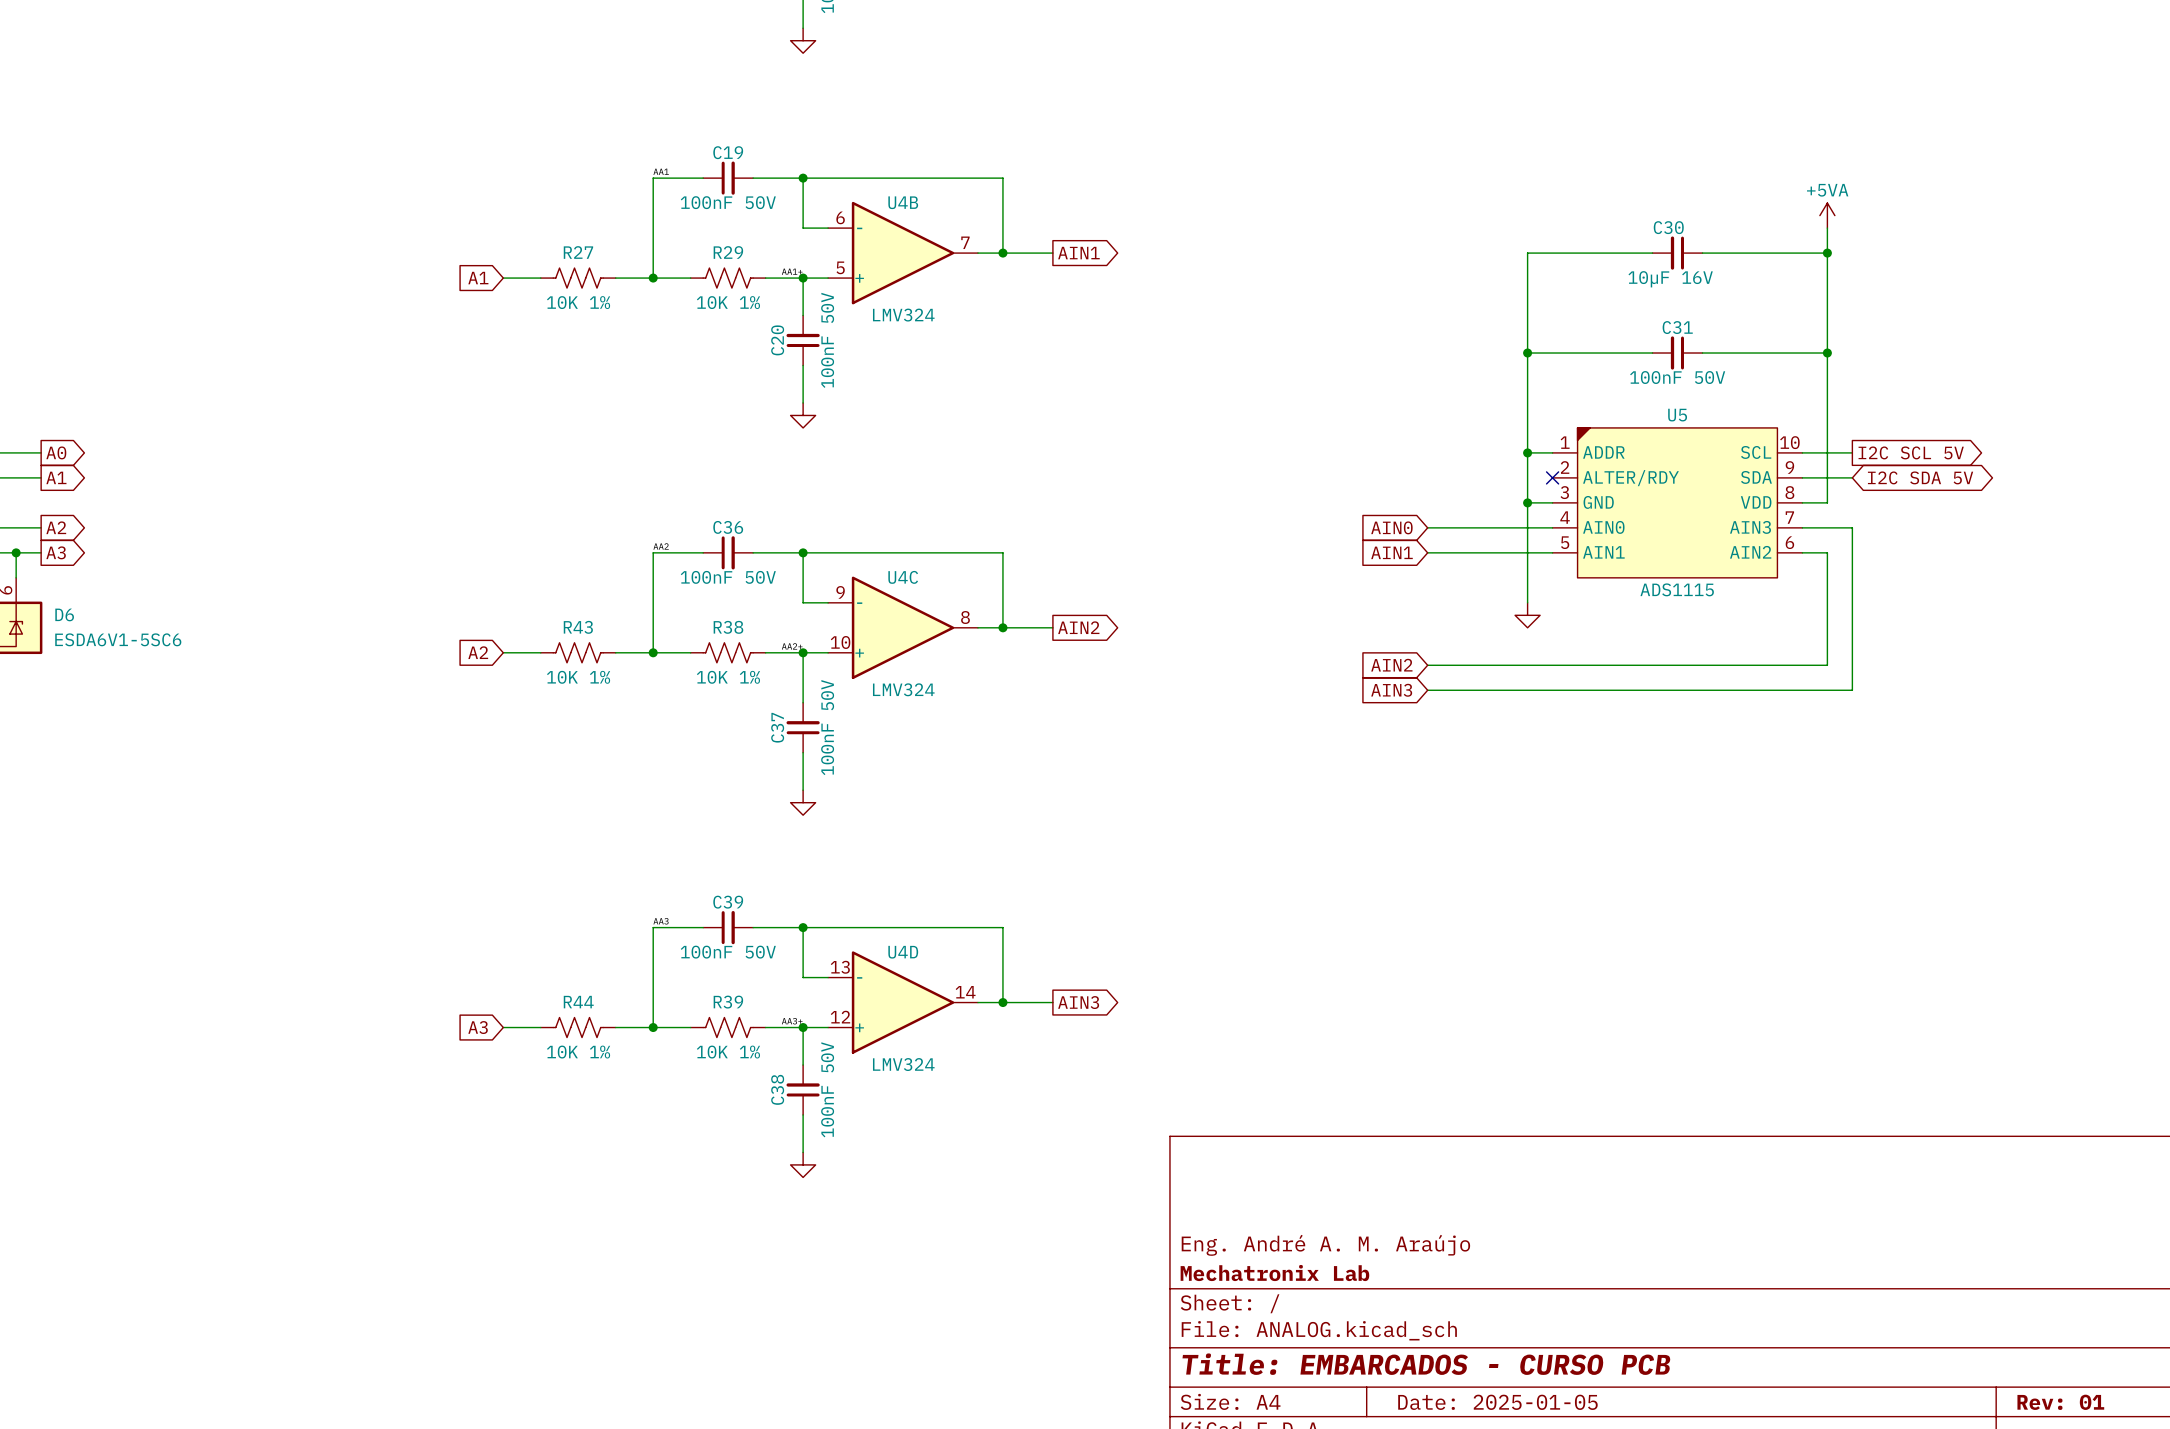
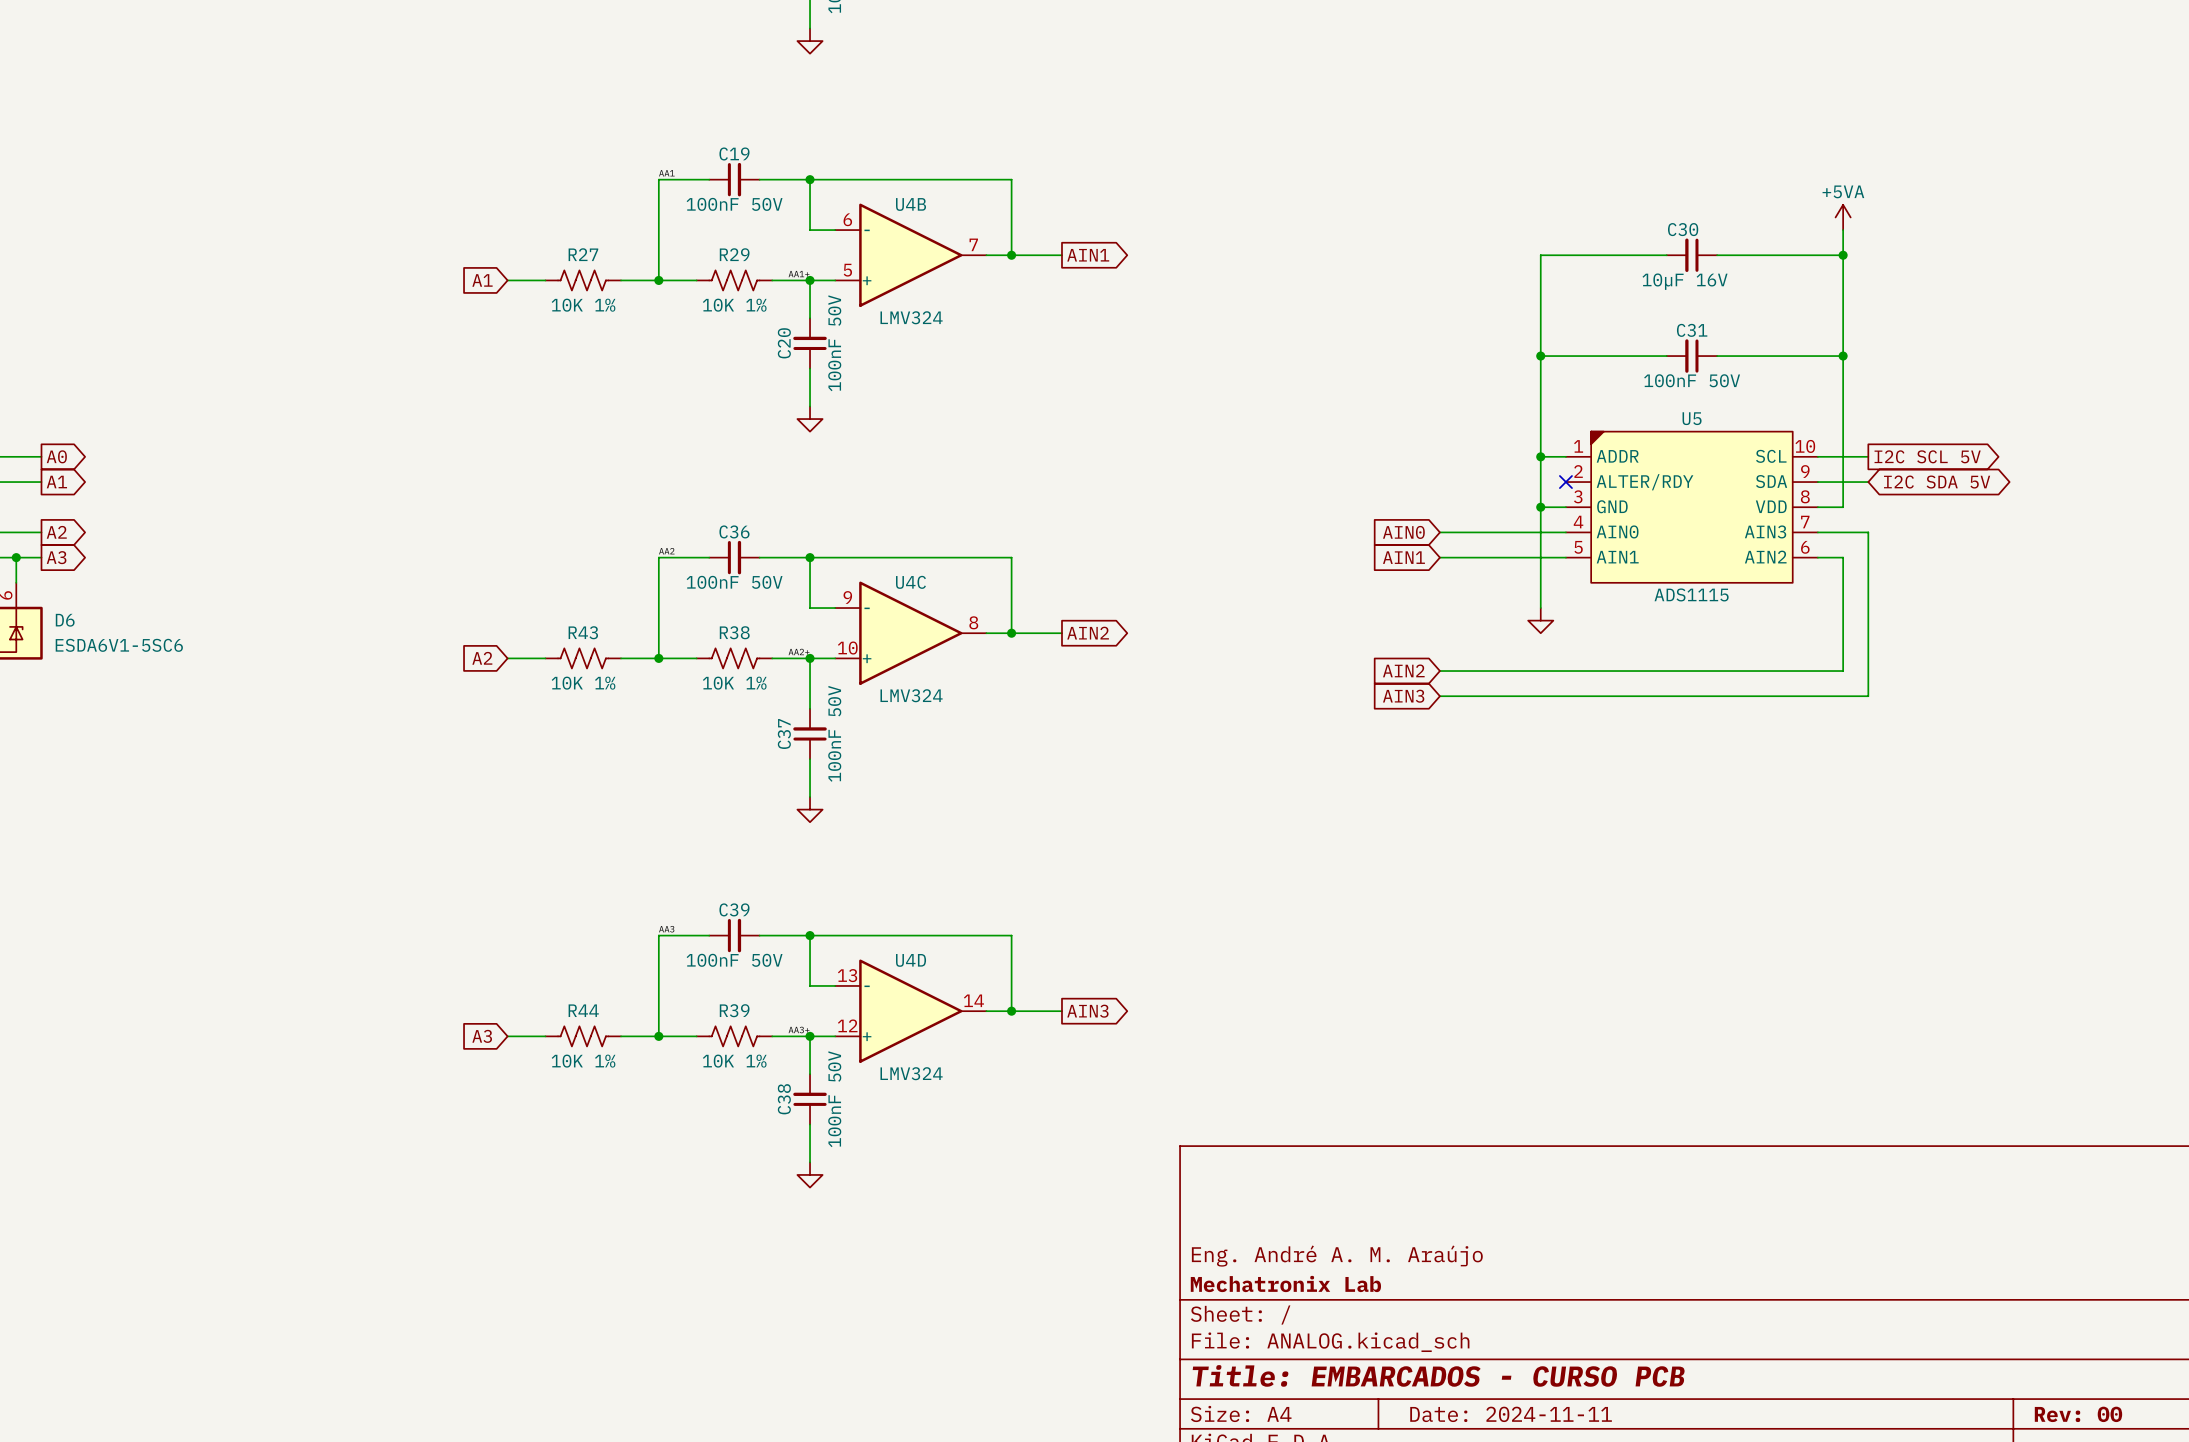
title block: Date: 2025-01-05 (1497, 1402) -> Date: 2024-11-11 (1511, 1414)
title block: Rev: 01 (2060, 1402) -> Rev: 00 (2078, 1414)

